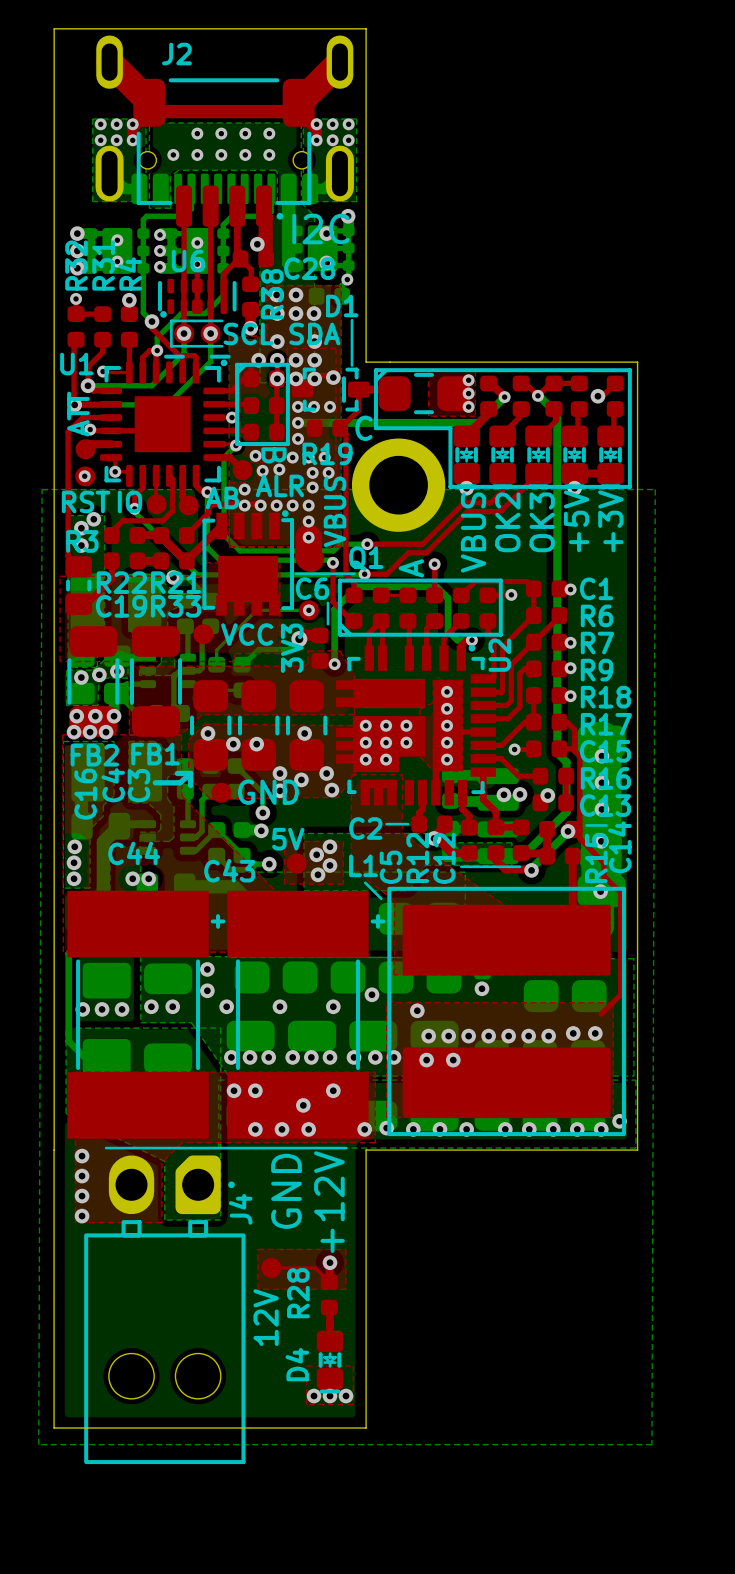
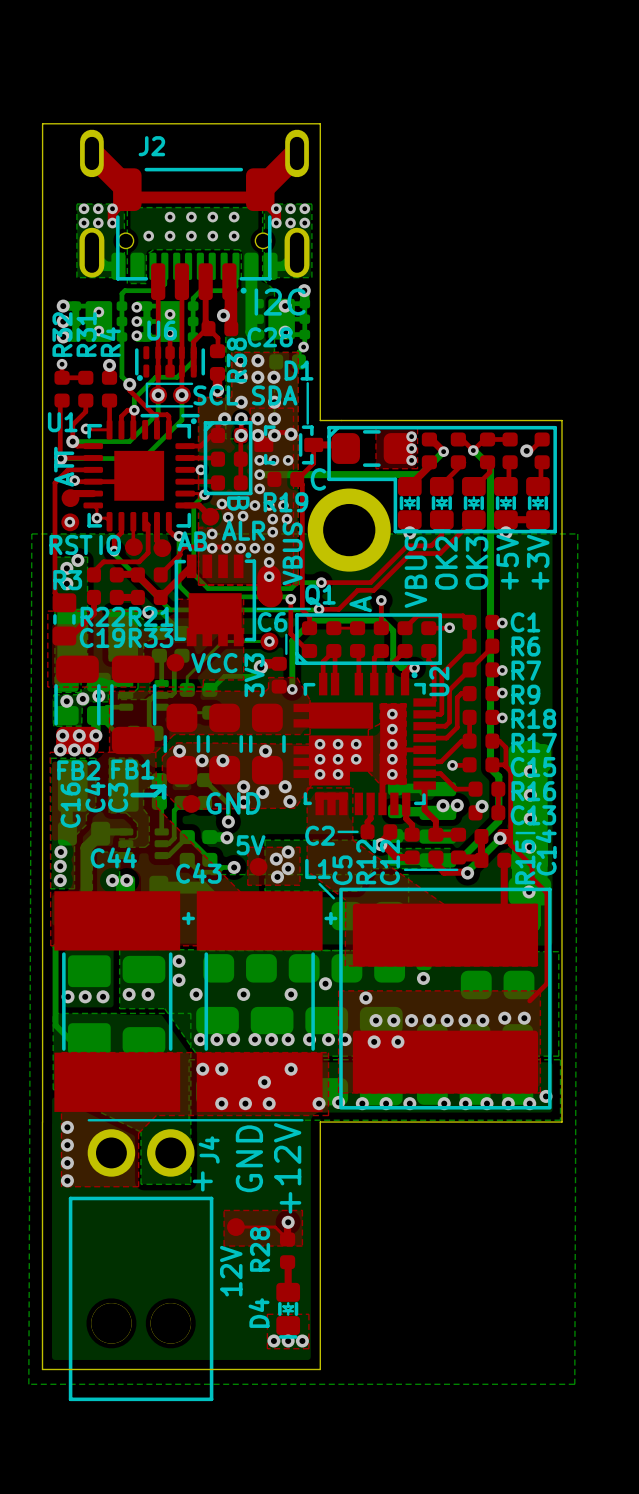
J4 footprint: [84, 1155, 246, 1465] -> [68, 1129, 214, 1402]

